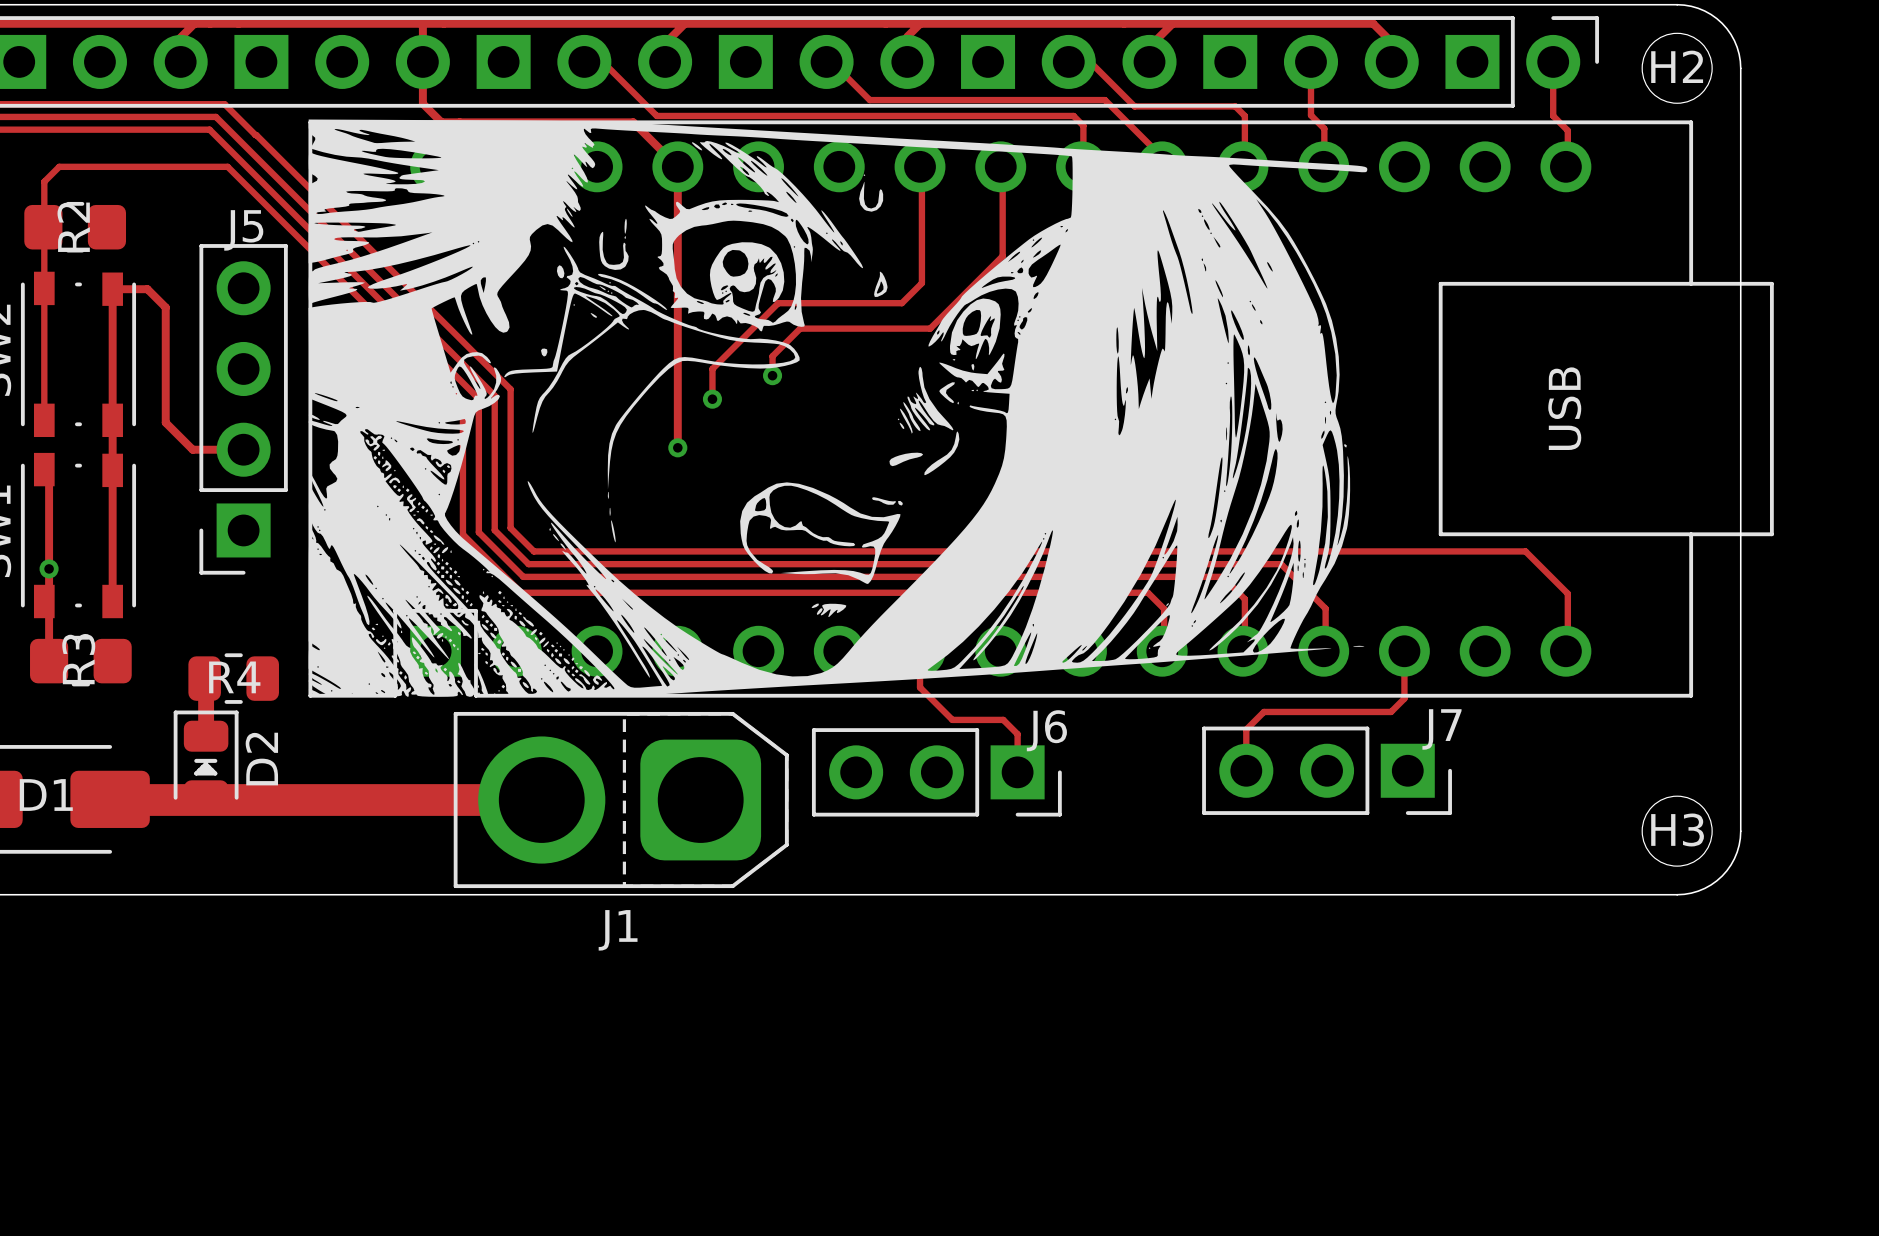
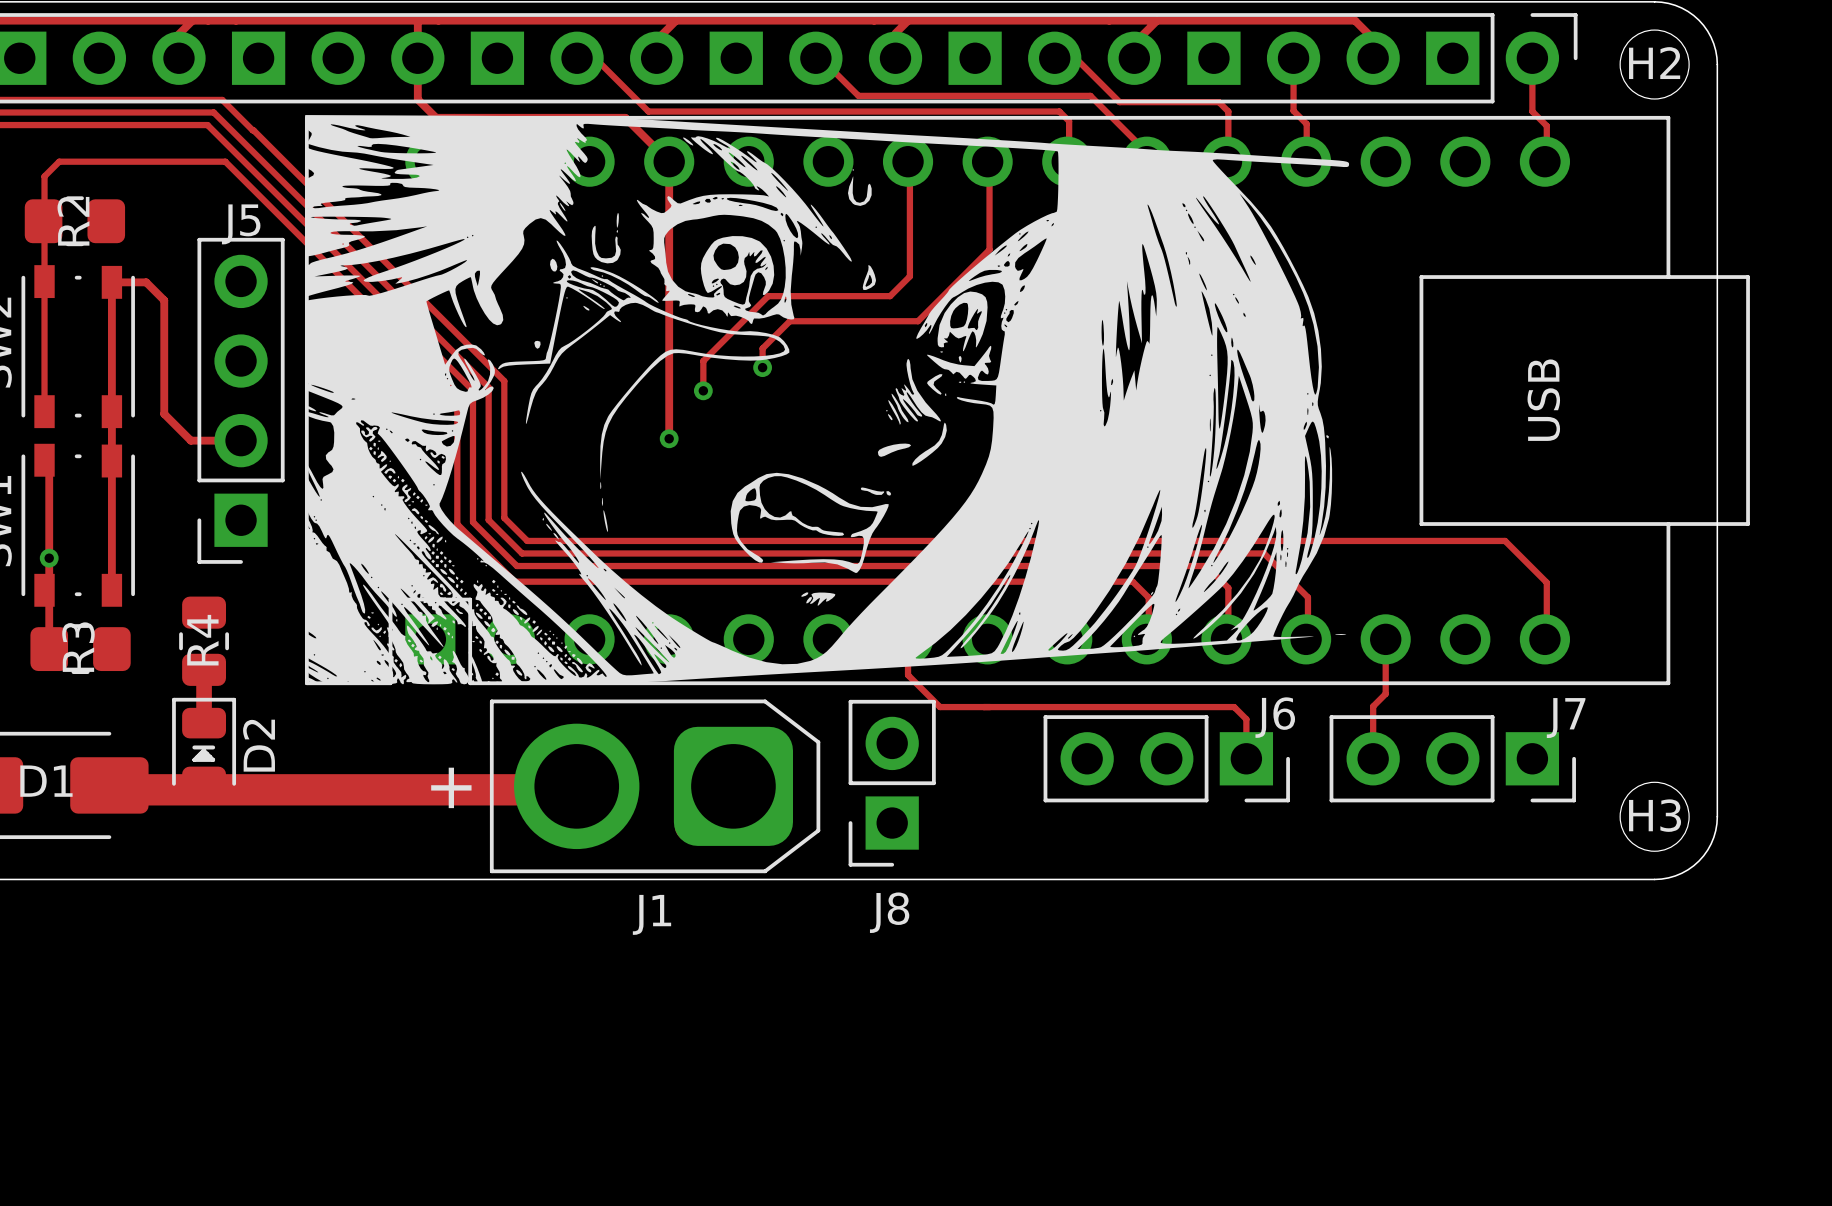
R4 rotation: 0° (233, 678) -> 90° clockwise (204, 641)
track: (1404, 698) (1391, 711) (1263, 711) (1246, 729) (1246, 770) -> (1385, 686) (1385, 693) (1373, 706) (1373, 758)
J1 footprint: [453, 711, 789, 889] -> [489, 699, 821, 874]
track: (1003, 719) (1017, 734) (1017, 772) -> (990, 707) (1234, 707) (1246, 719) (1246, 759)
J7 position: (1327, 770) -> (1452, 758)
J6 position: (936, 772) -> (1166, 758)
J8: none -> (892, 783)
track: (532, 799) (541, 800) (127, 800) -> (576, 786) (573, 789) (129, 789) (126, 786)

